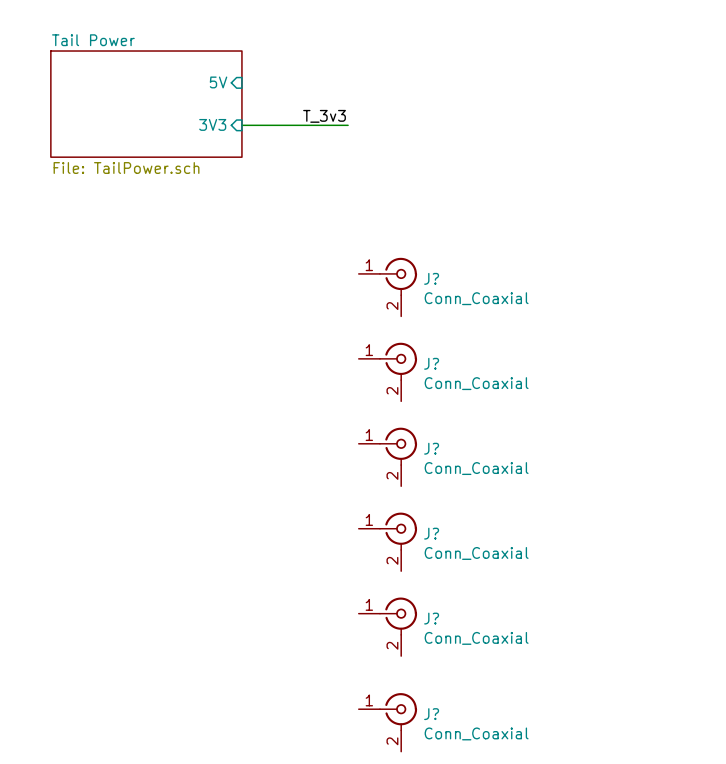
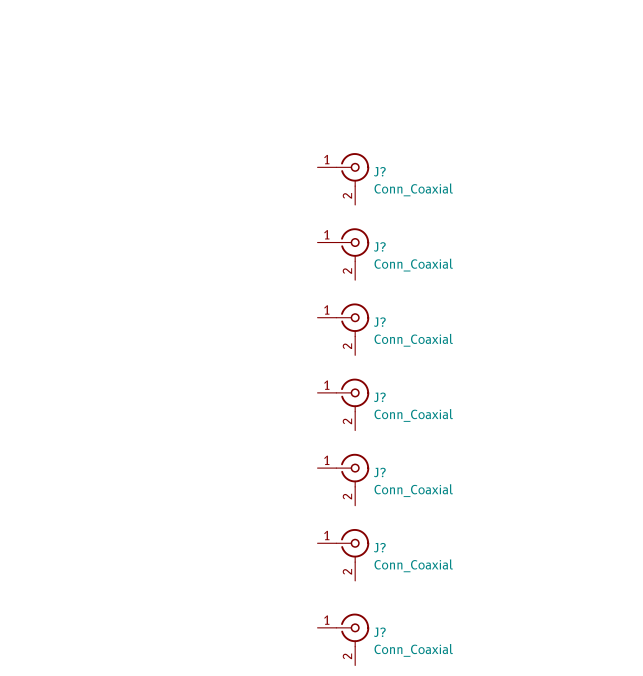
sheet pin: 5V (218, 82) -> none
sheet Tail Power: File: TailPower.sch (146, 104) -> none
label: T_3v3 (324, 116) -> none
sheet pin: 3V3 (212, 124) -> none
wire: (241, 125) (348, 125) -> none
J?: none -> Conn_Coaxial (343, 178)

